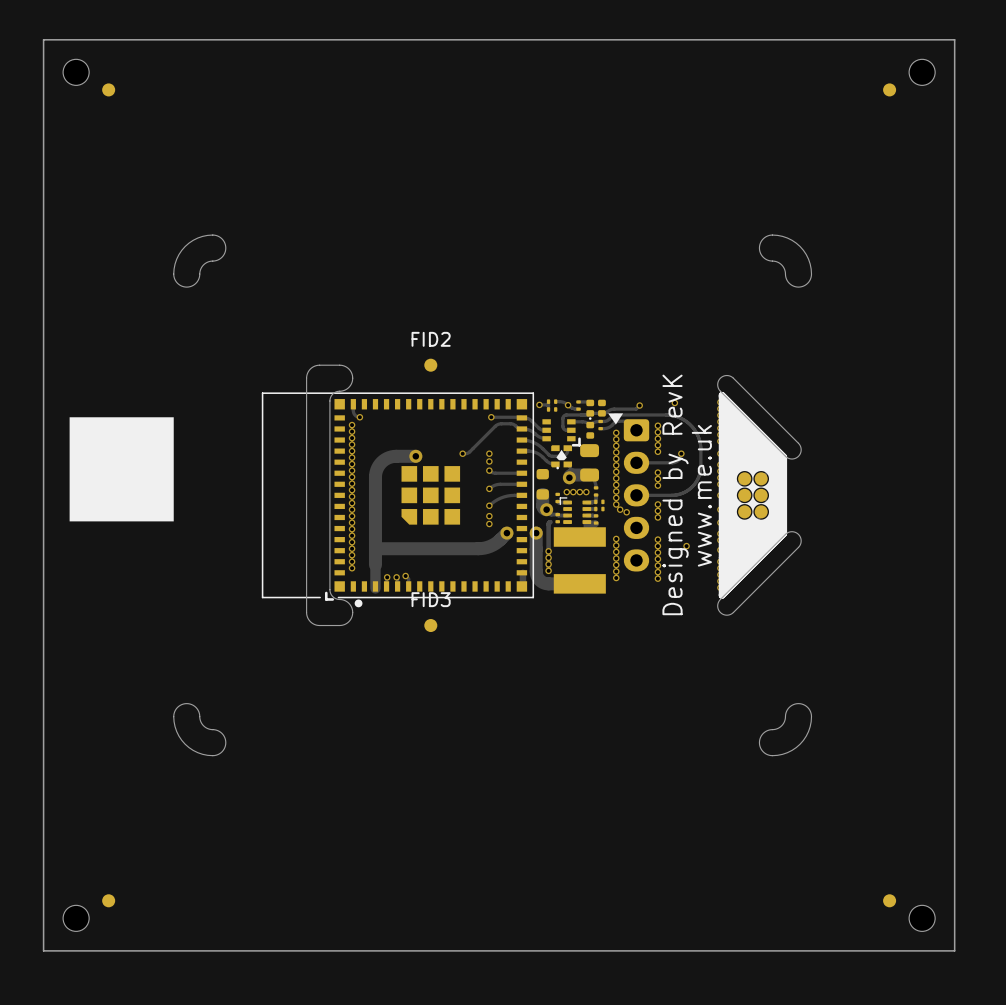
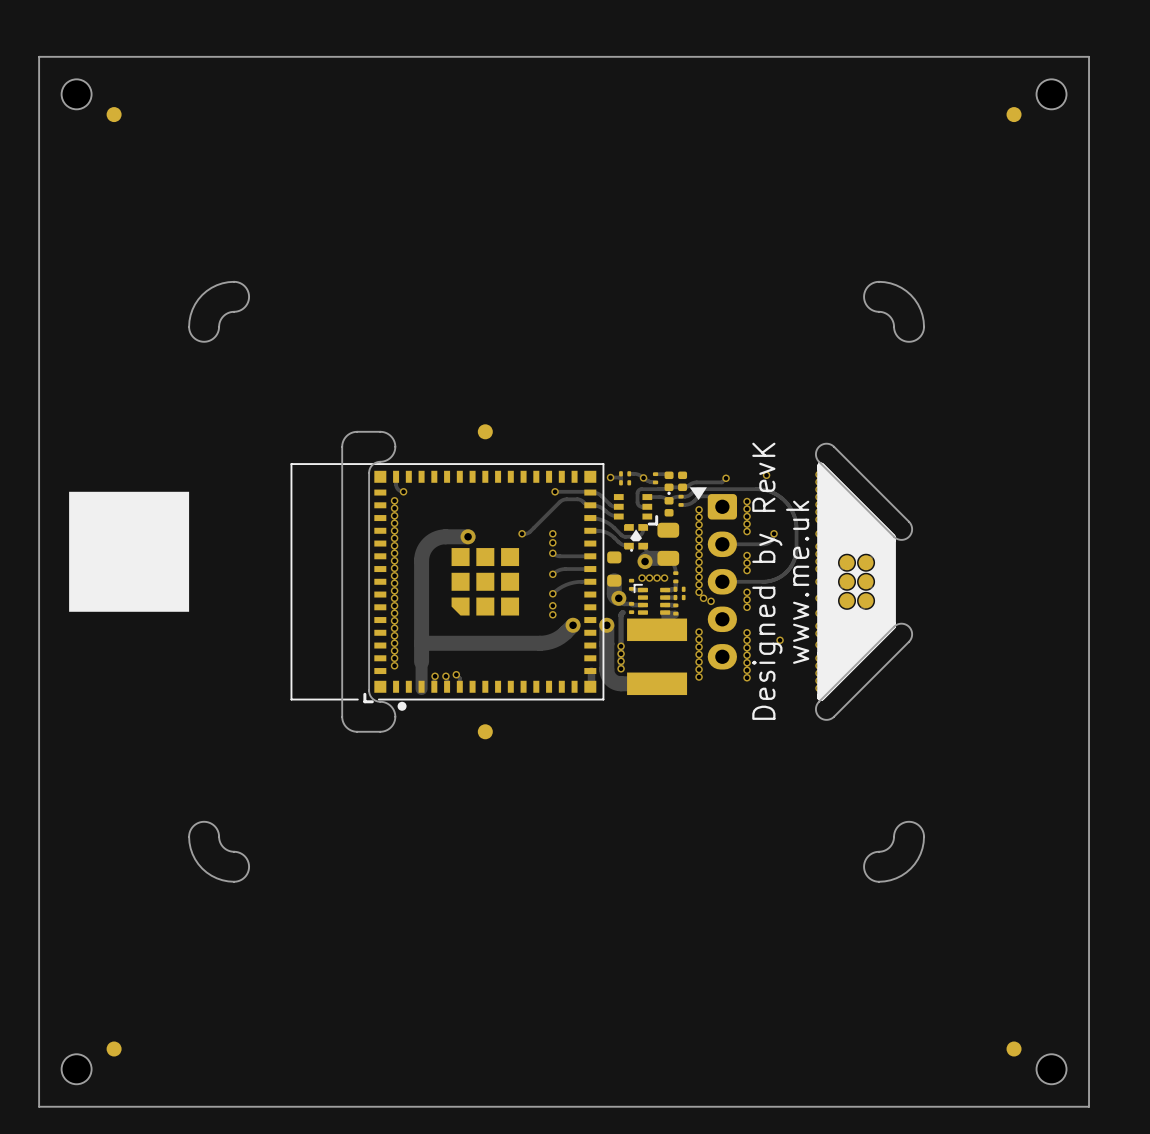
FID2 name: FID2 (431, 339) -> none
FID3 name: FID3 (431, 599) -> none

